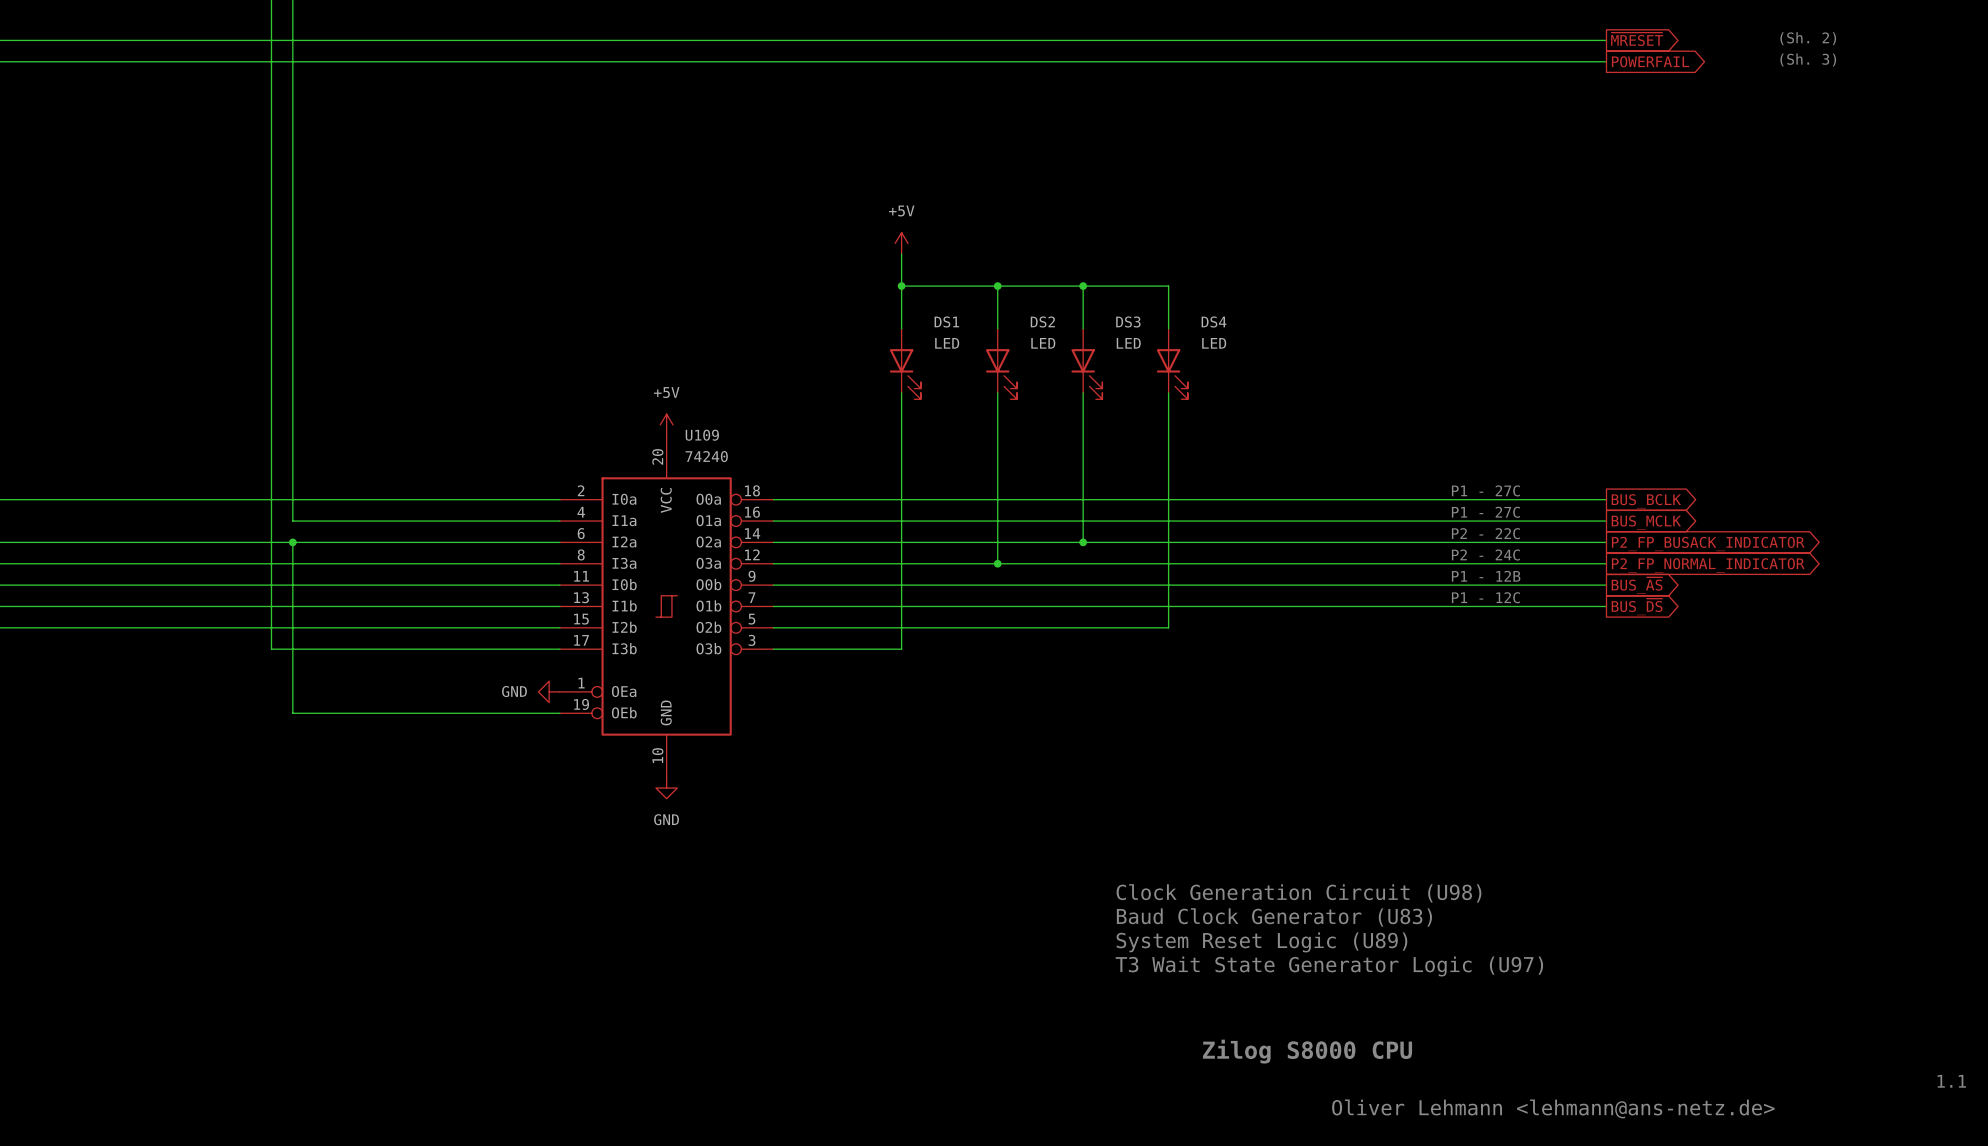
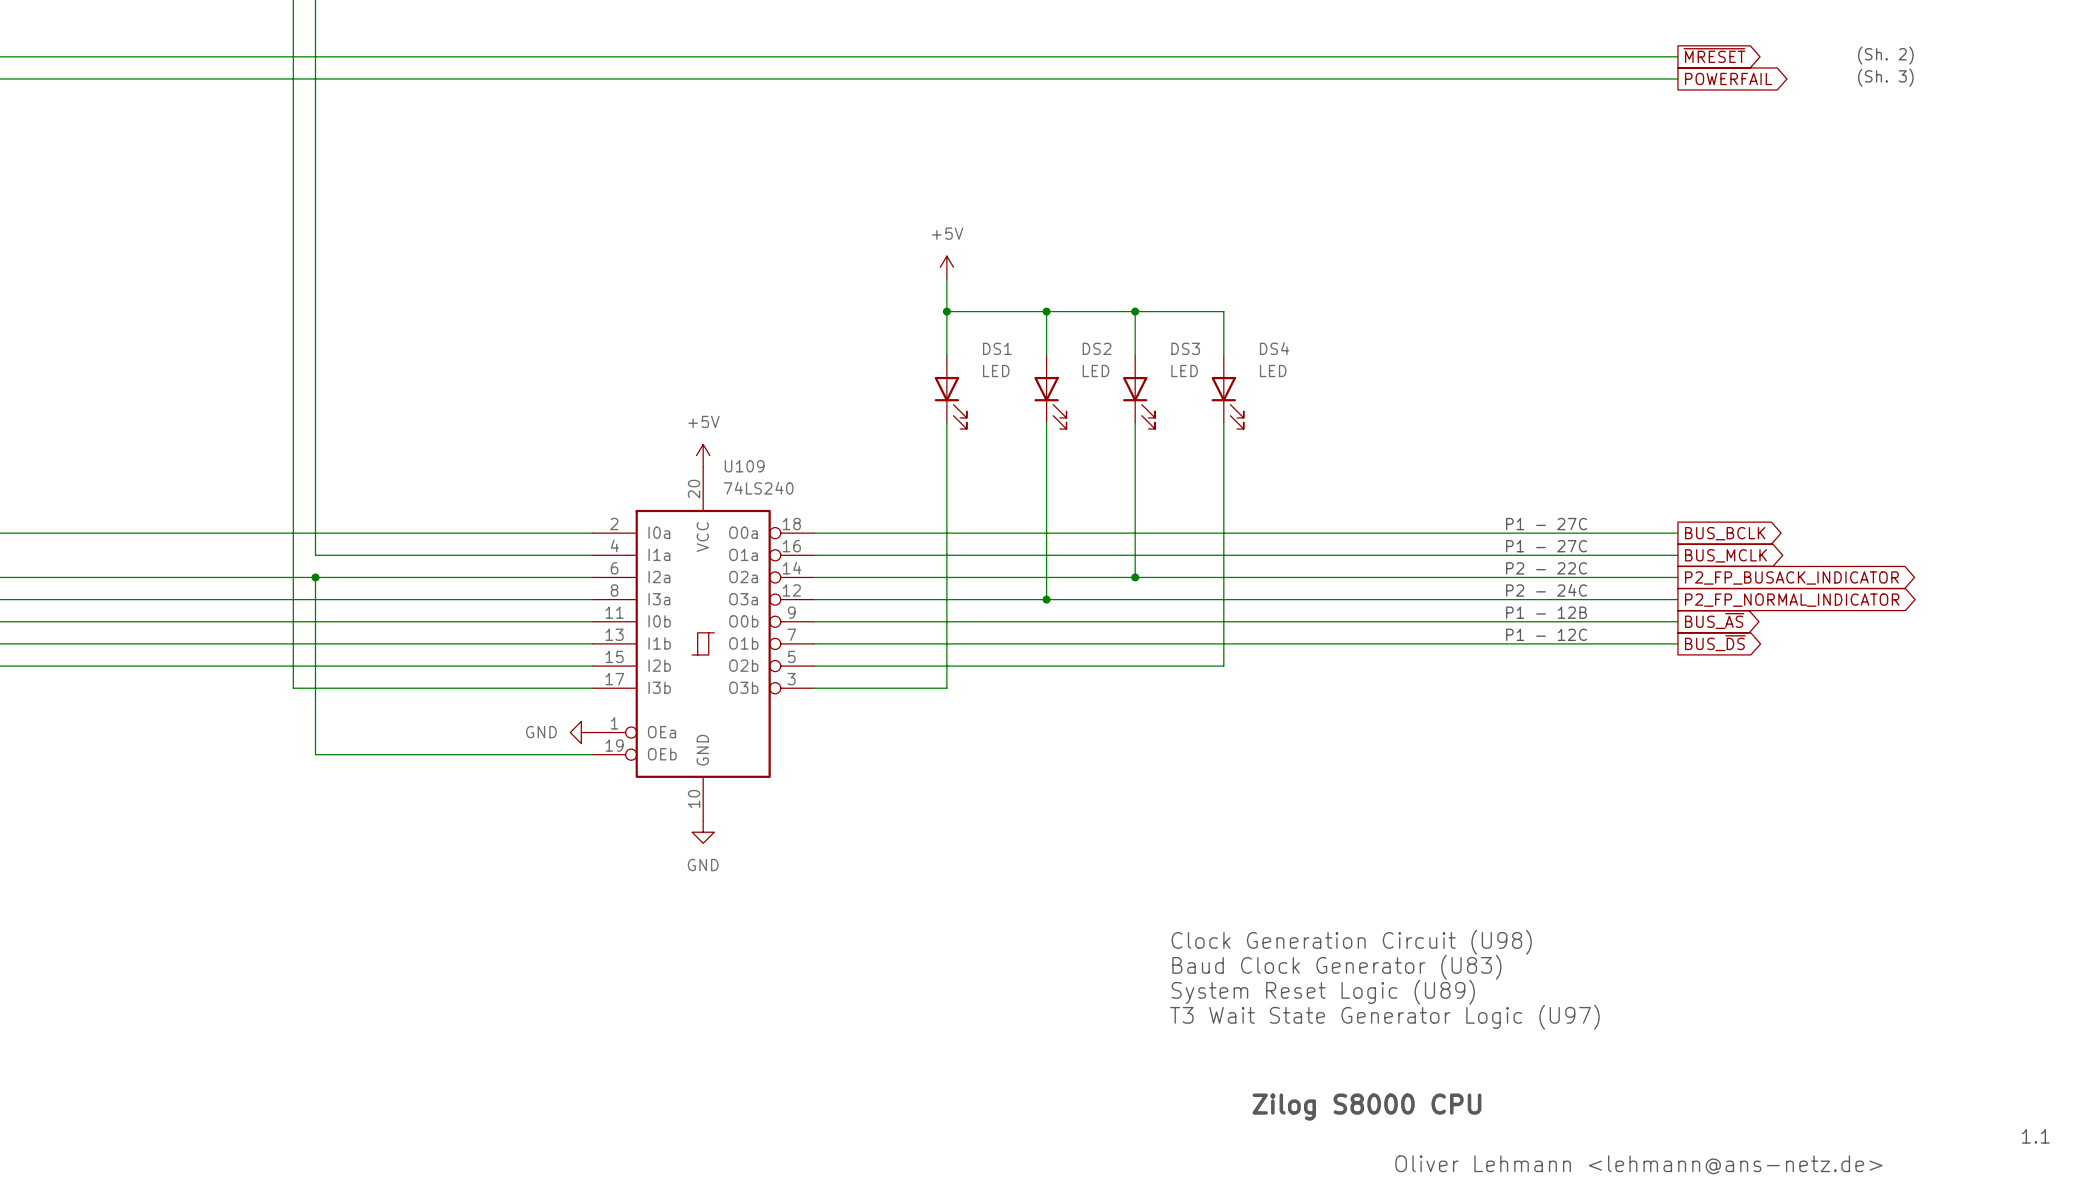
U109 value: 74240 (706, 456) -> 74LS240 (758, 488)

